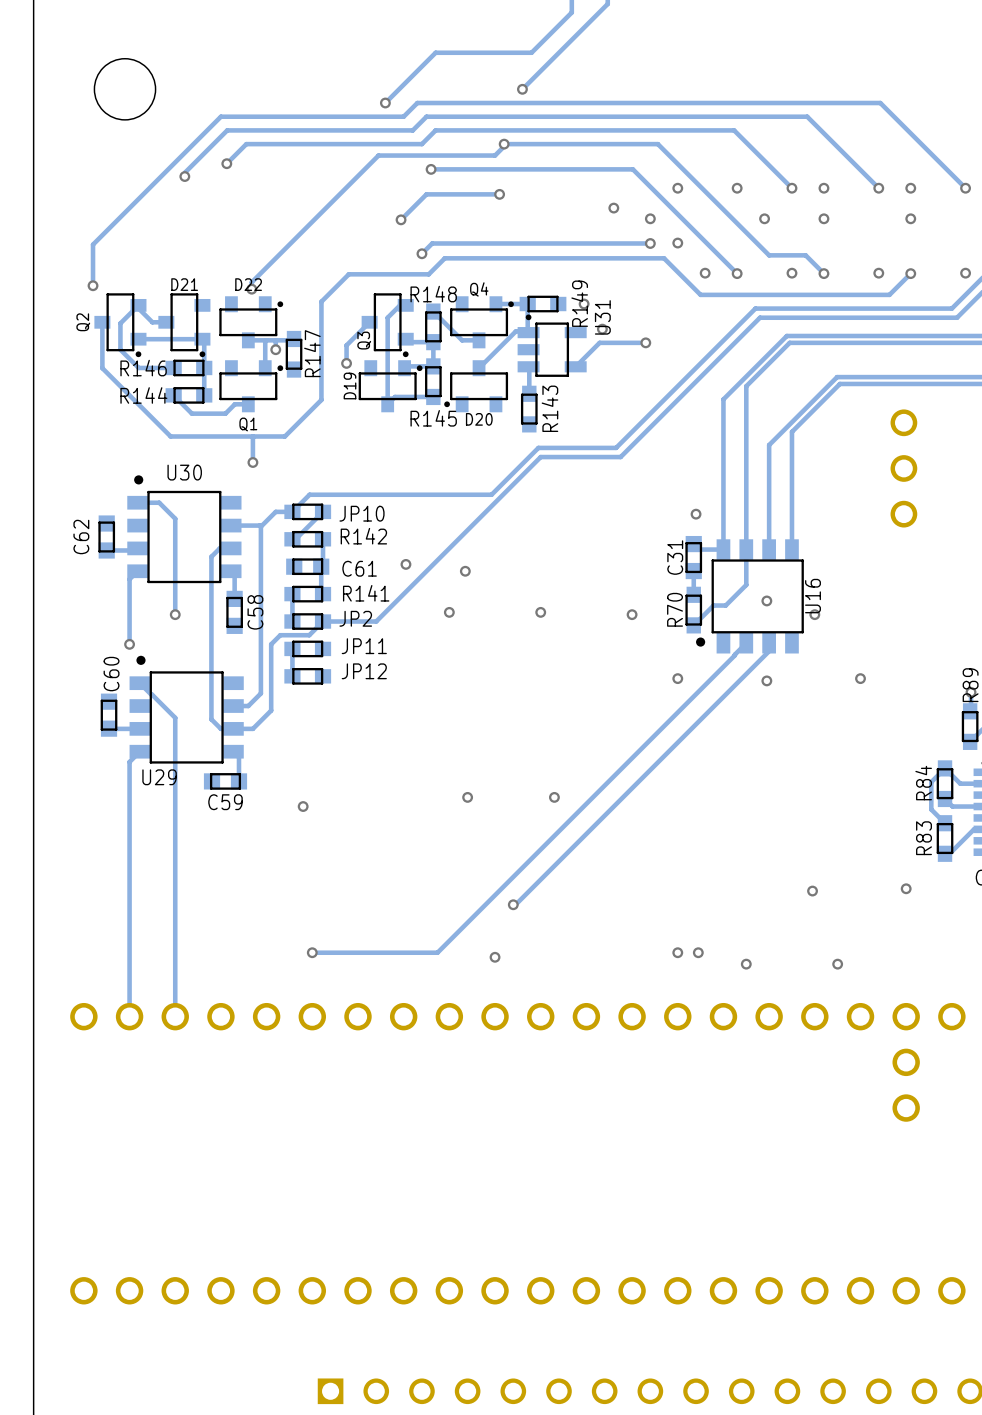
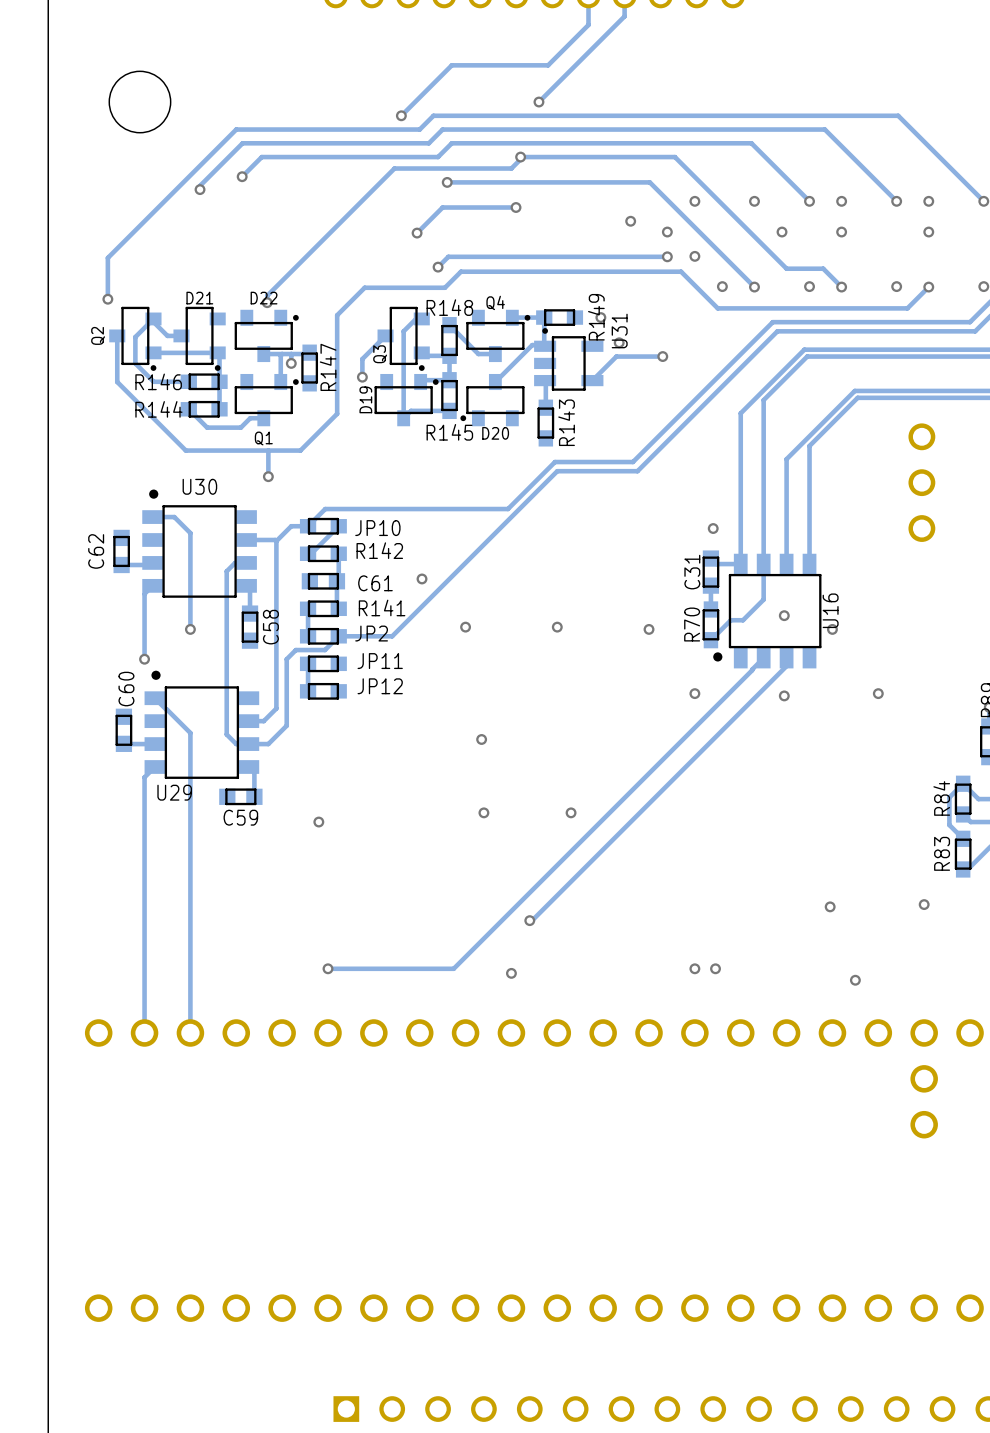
via: (465, 571) -> none
via: none -> (481, 739)
via: (746, 964) -> none

